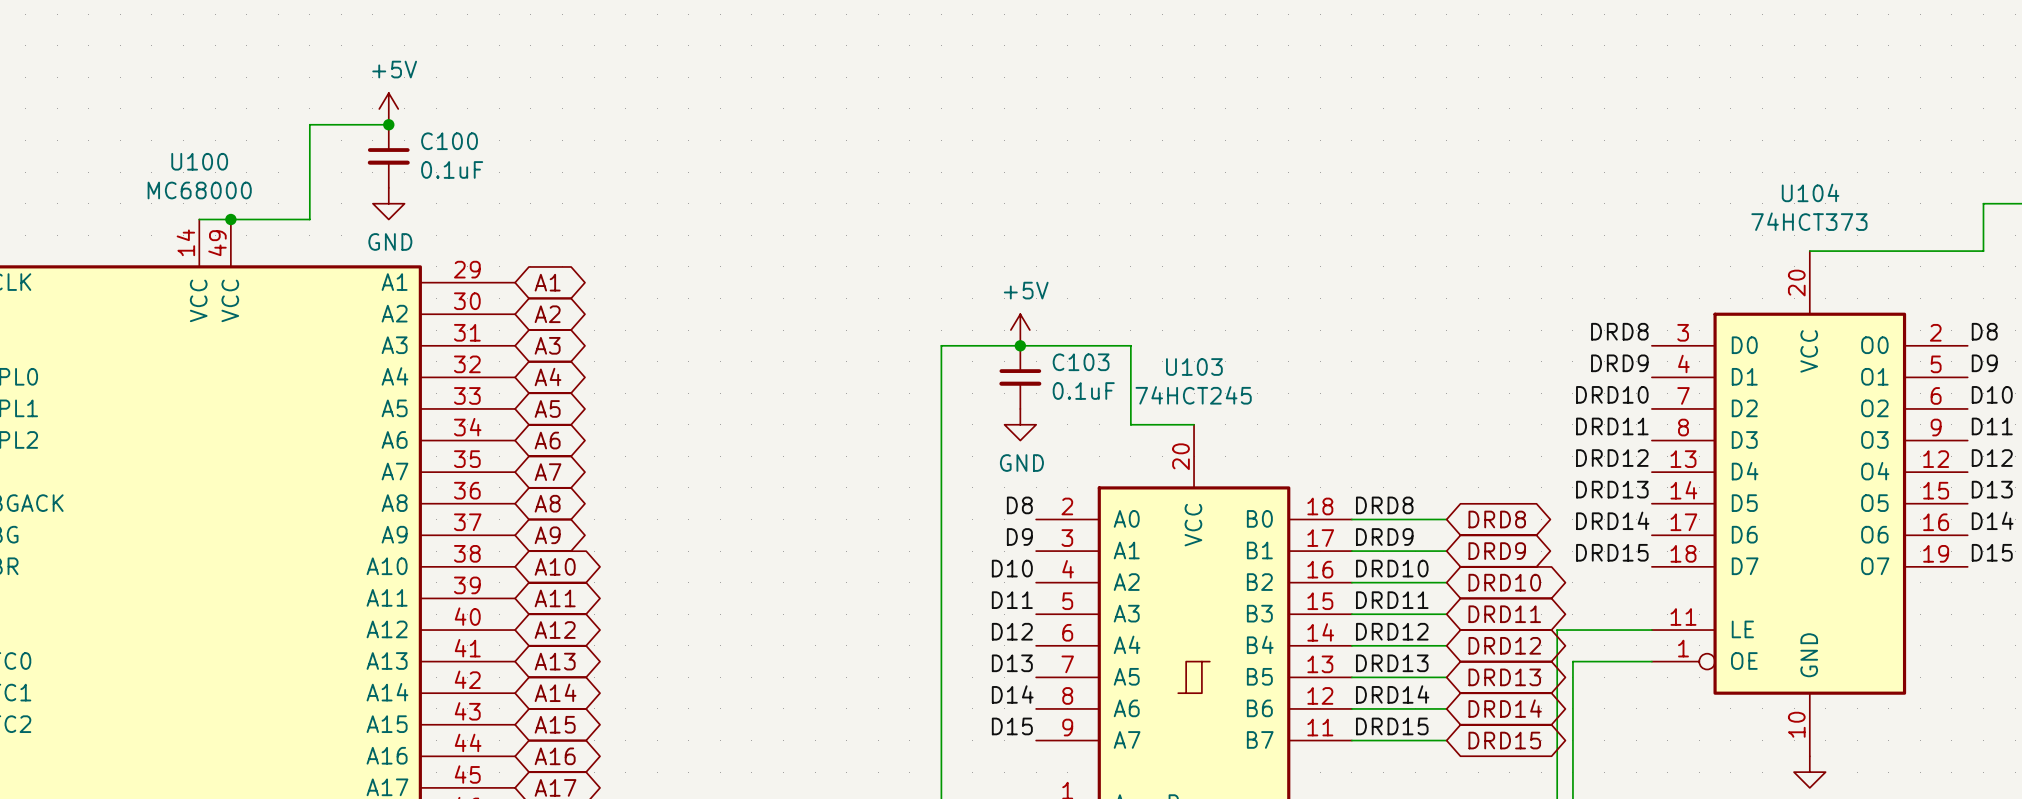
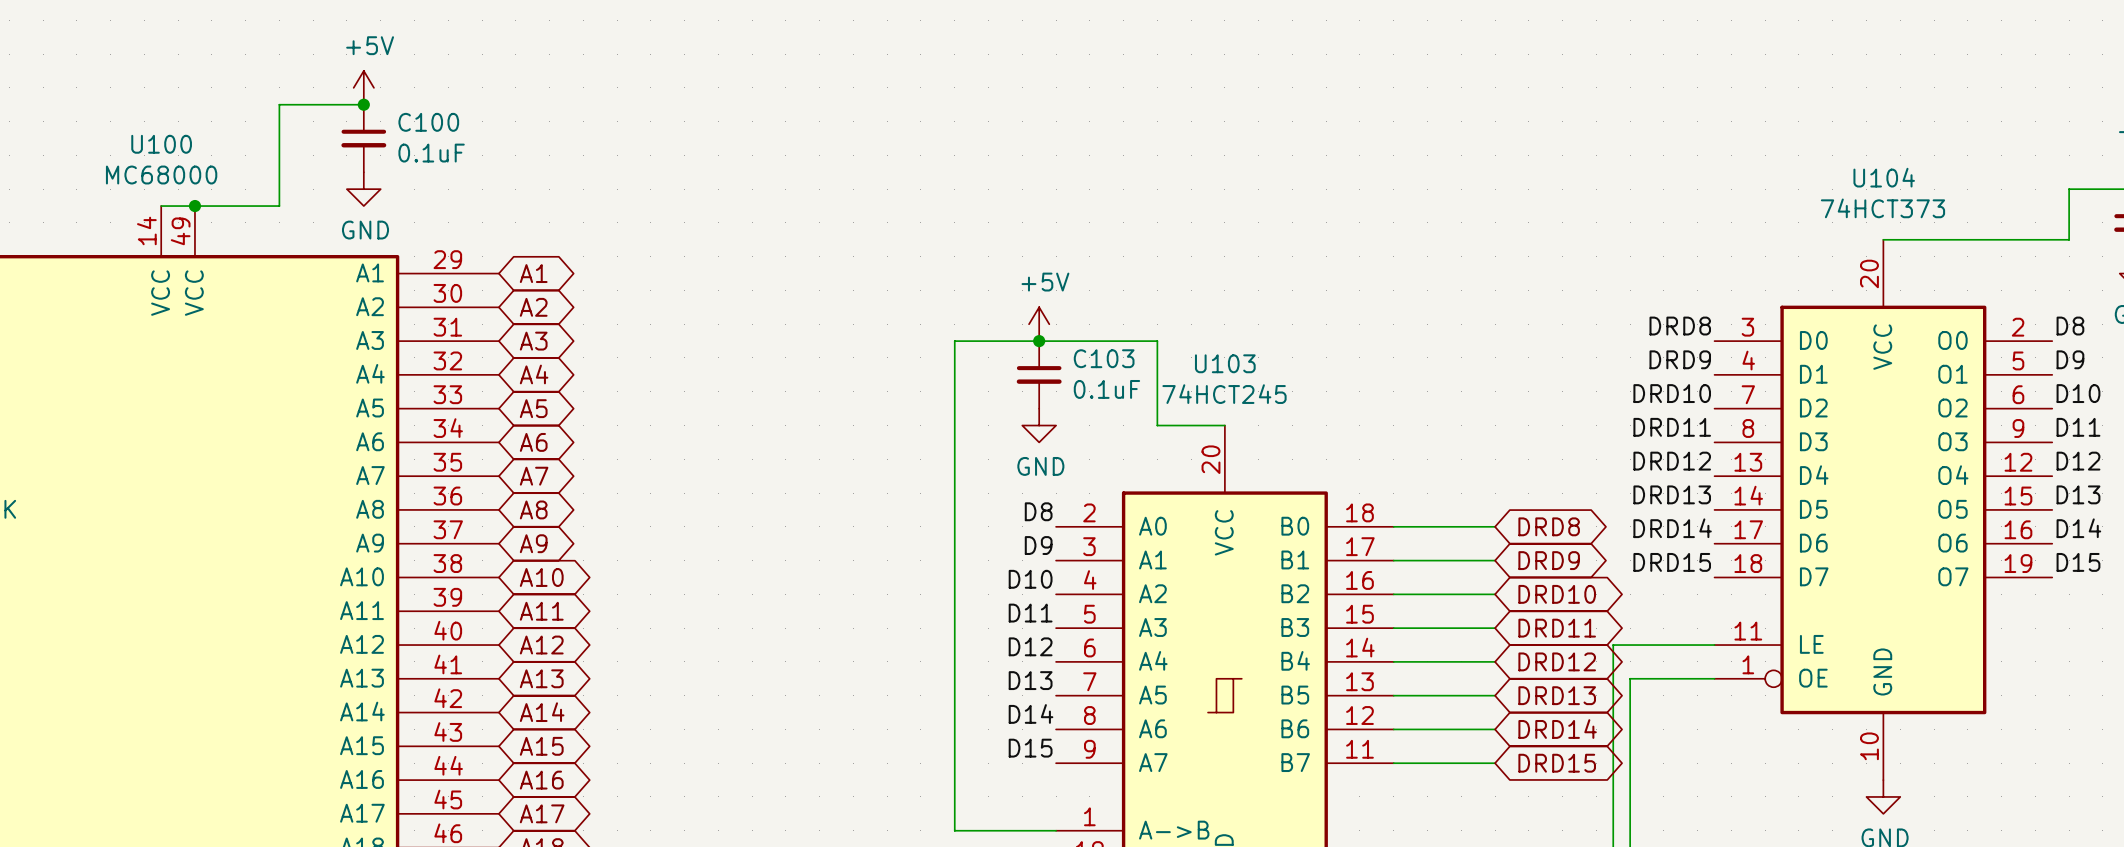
label: DRD8 (1384, 505) -> none
label: DRD9 (1384, 536) -> none
label: DRD10 (1392, 568) -> none
label: DRD11 (1392, 600) -> none
label: DRD12 (1392, 631) -> none
label: DRD13 (1392, 663) -> none
label: DRD14 (1392, 694) -> none
label: DRD15 (1392, 726) -> none

